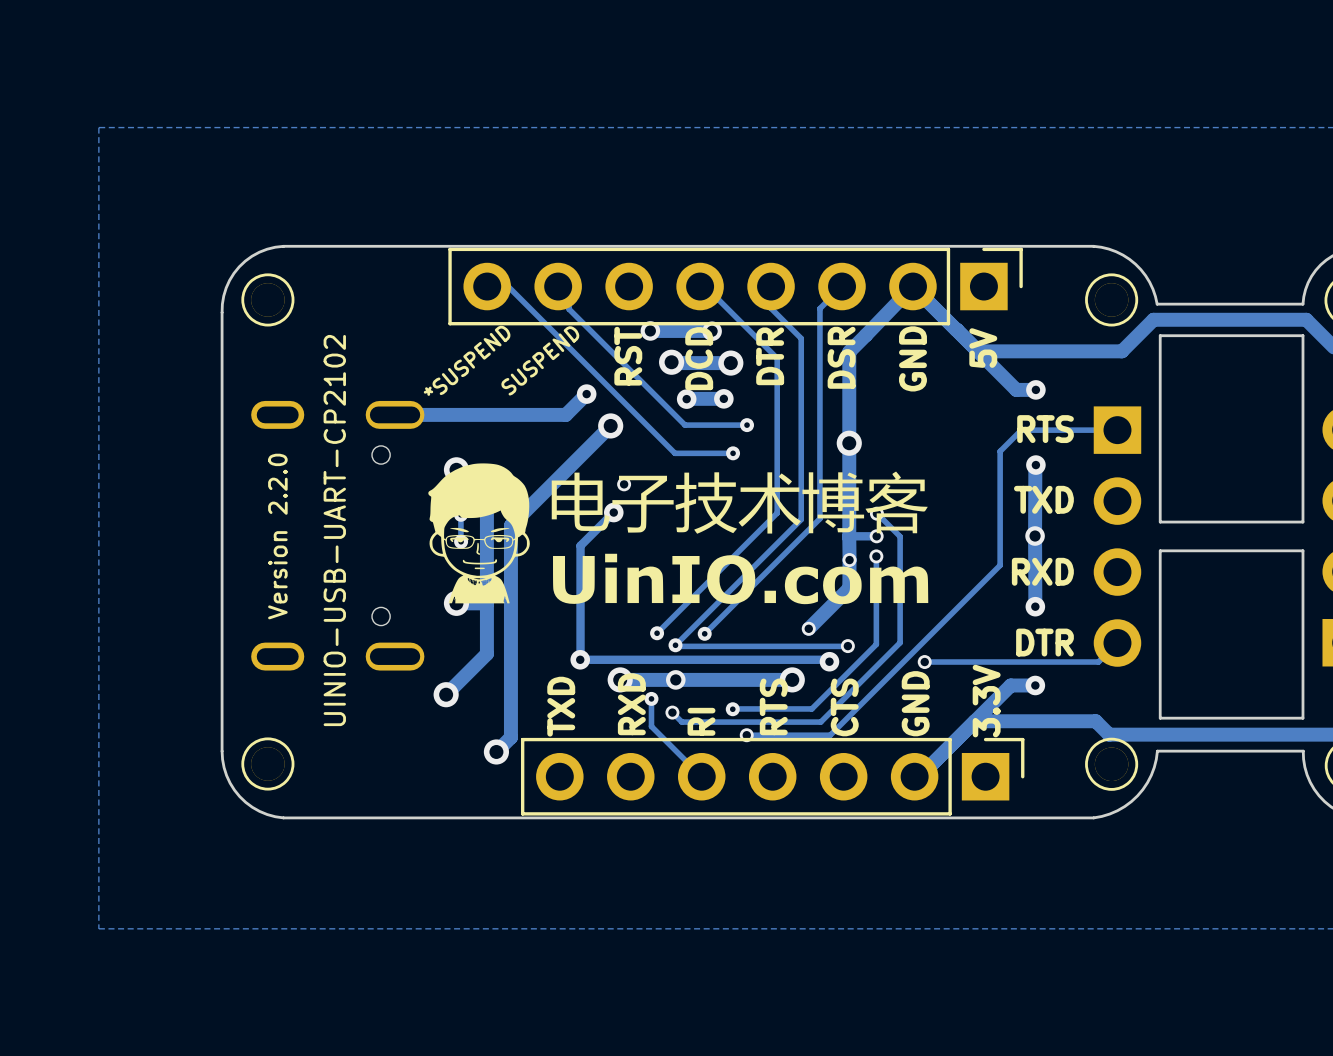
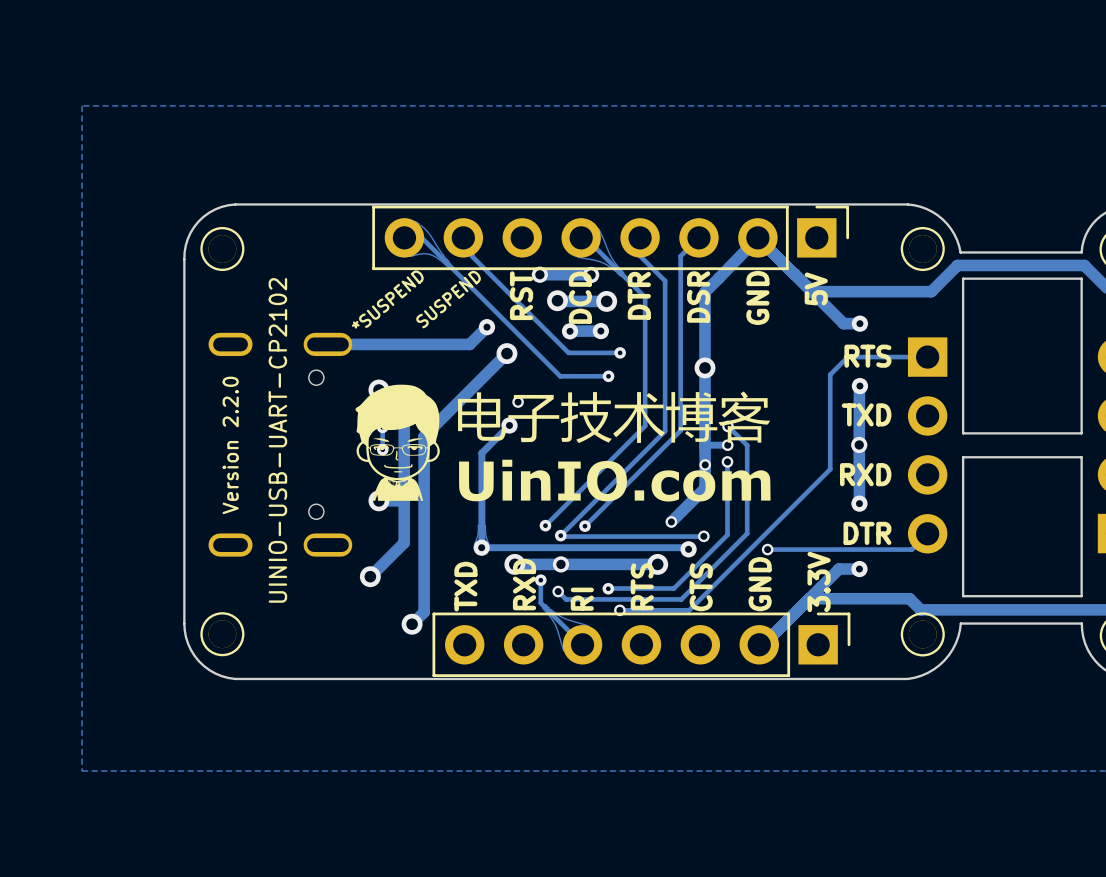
zone outline: none -> (415, 221) (394, 236) (410, 256) (430, 254) (447, 266) (450, 263) (428, 232) (415, 221)
zone outline: none -> (598, 228) (573, 232) (577, 257) (604, 263) (620, 276) (624, 273) (610, 255) (598, 228)
zone outline: none -> (485, 524) (489, 544) (481, 551) (474, 543) (477, 535) (478, 524) (485, 524)
zone outline: none -> (545, 604) (562, 617) (589, 626) (589, 651) (563, 651) (555, 624) (542, 607) (545, 604)

